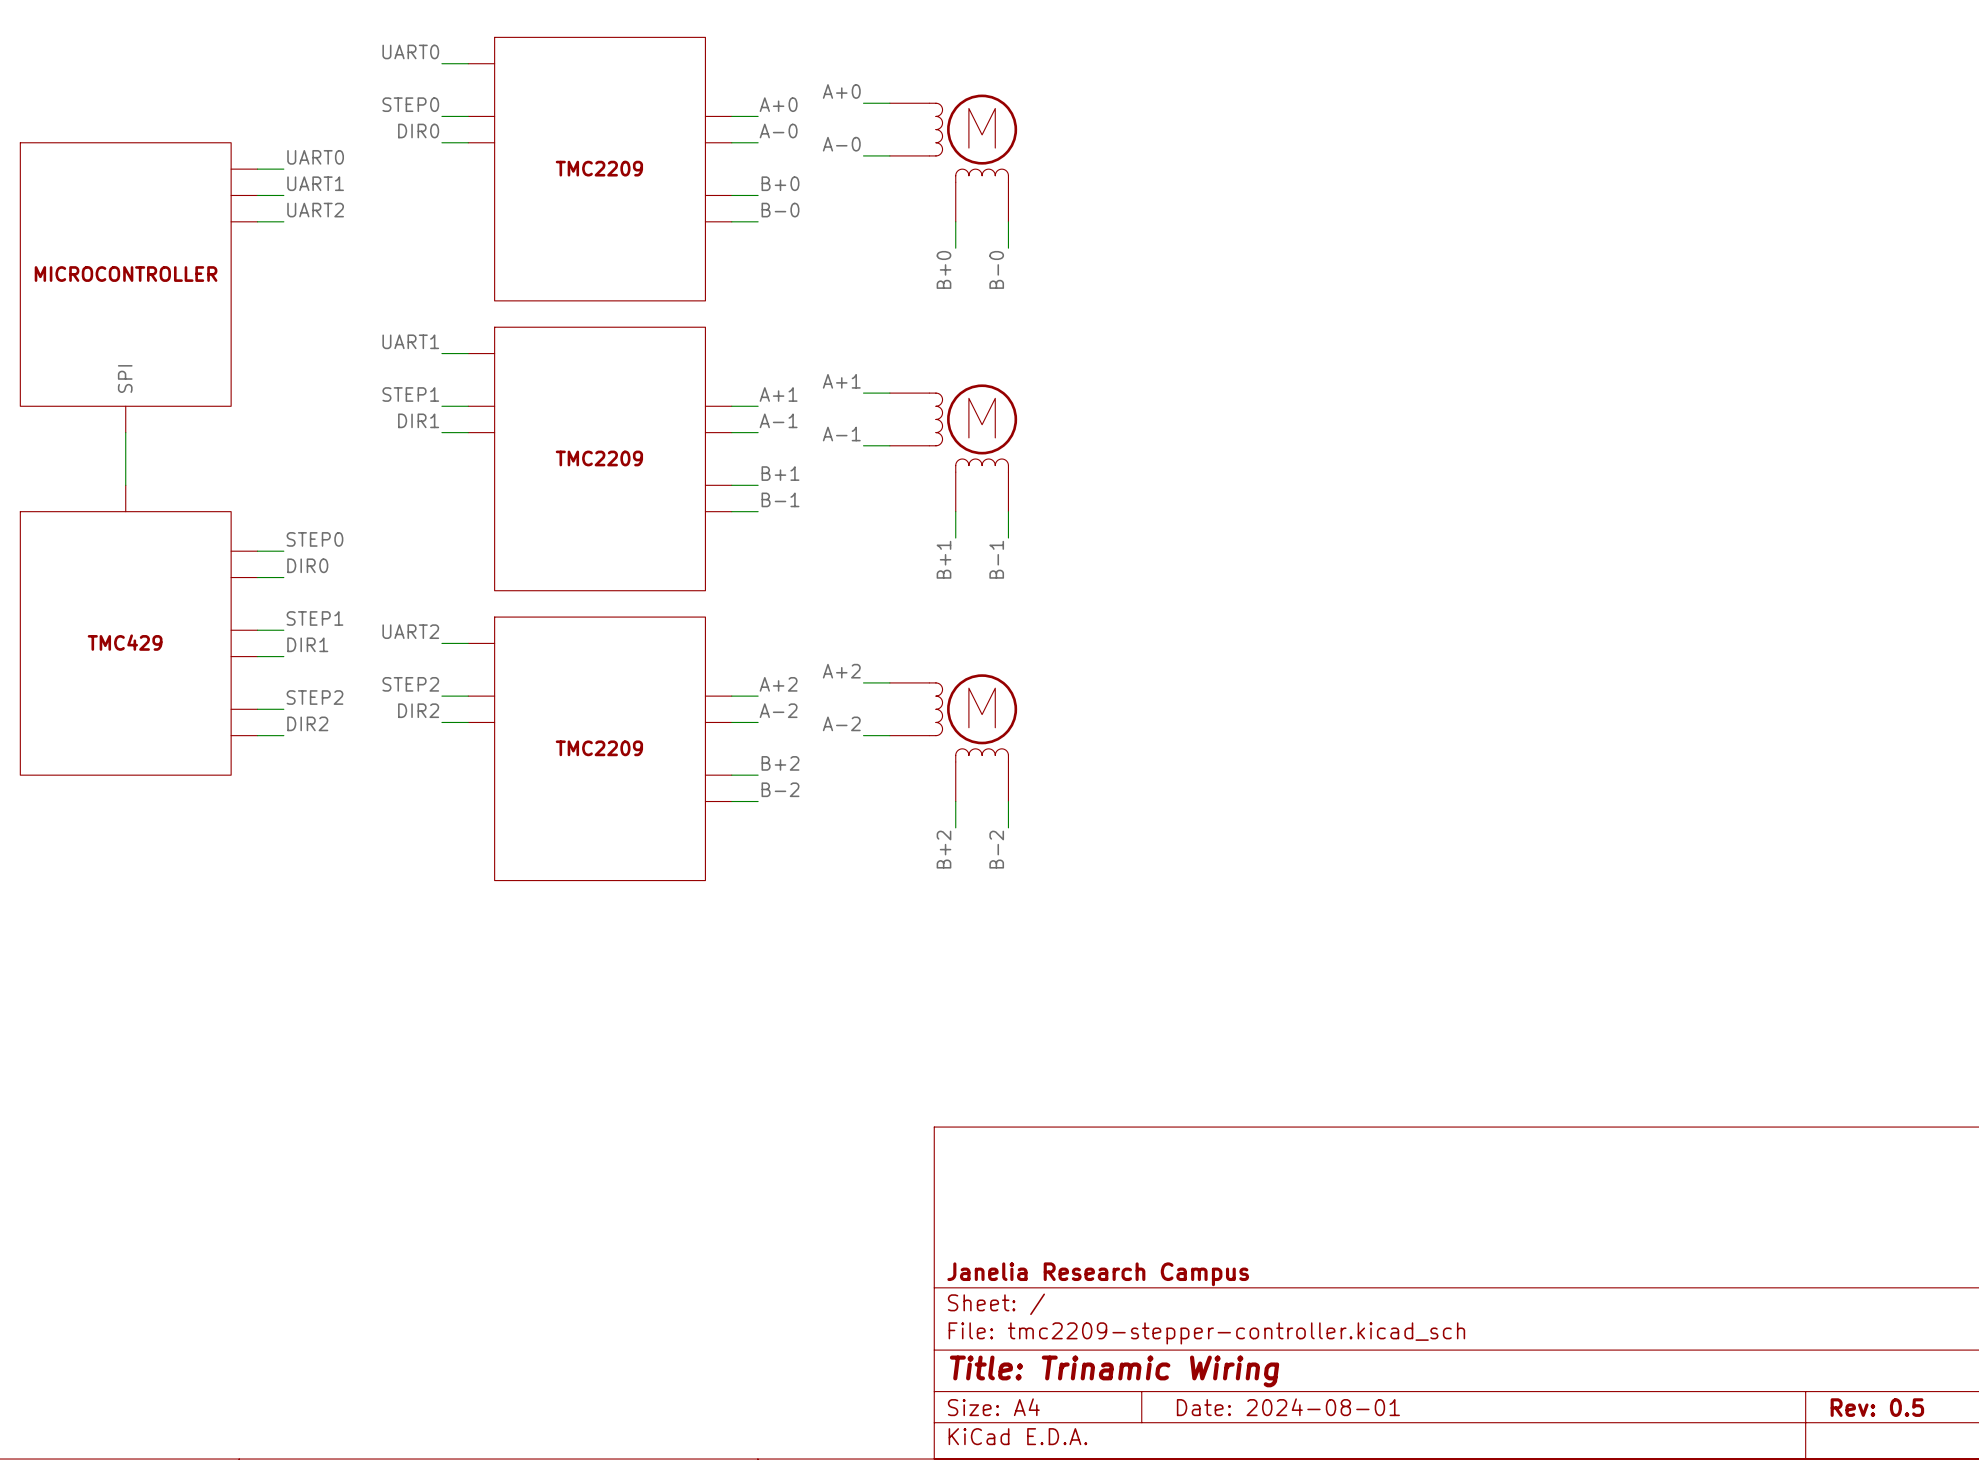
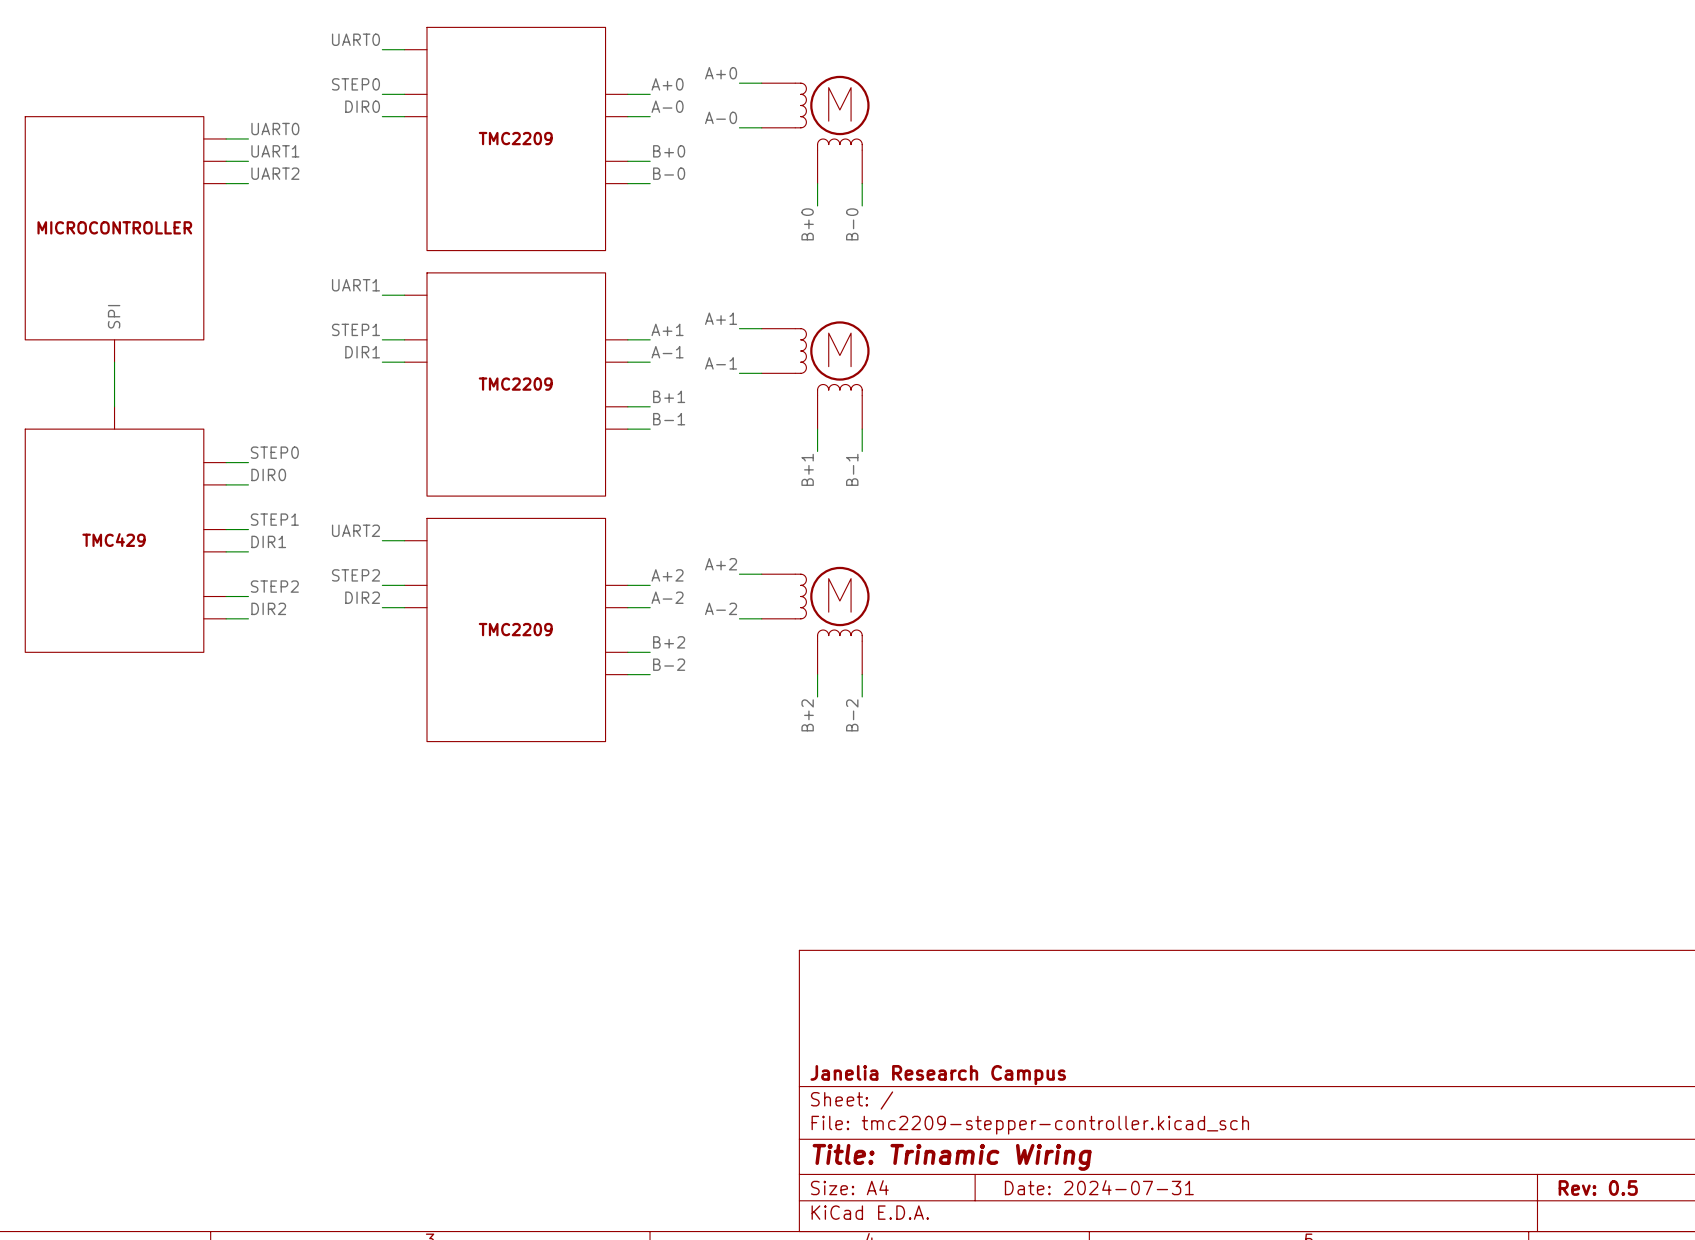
title block: Date: 2024-08-01 (1288, 1407) -> Date: 2024-07-31 (1099, 1187)

